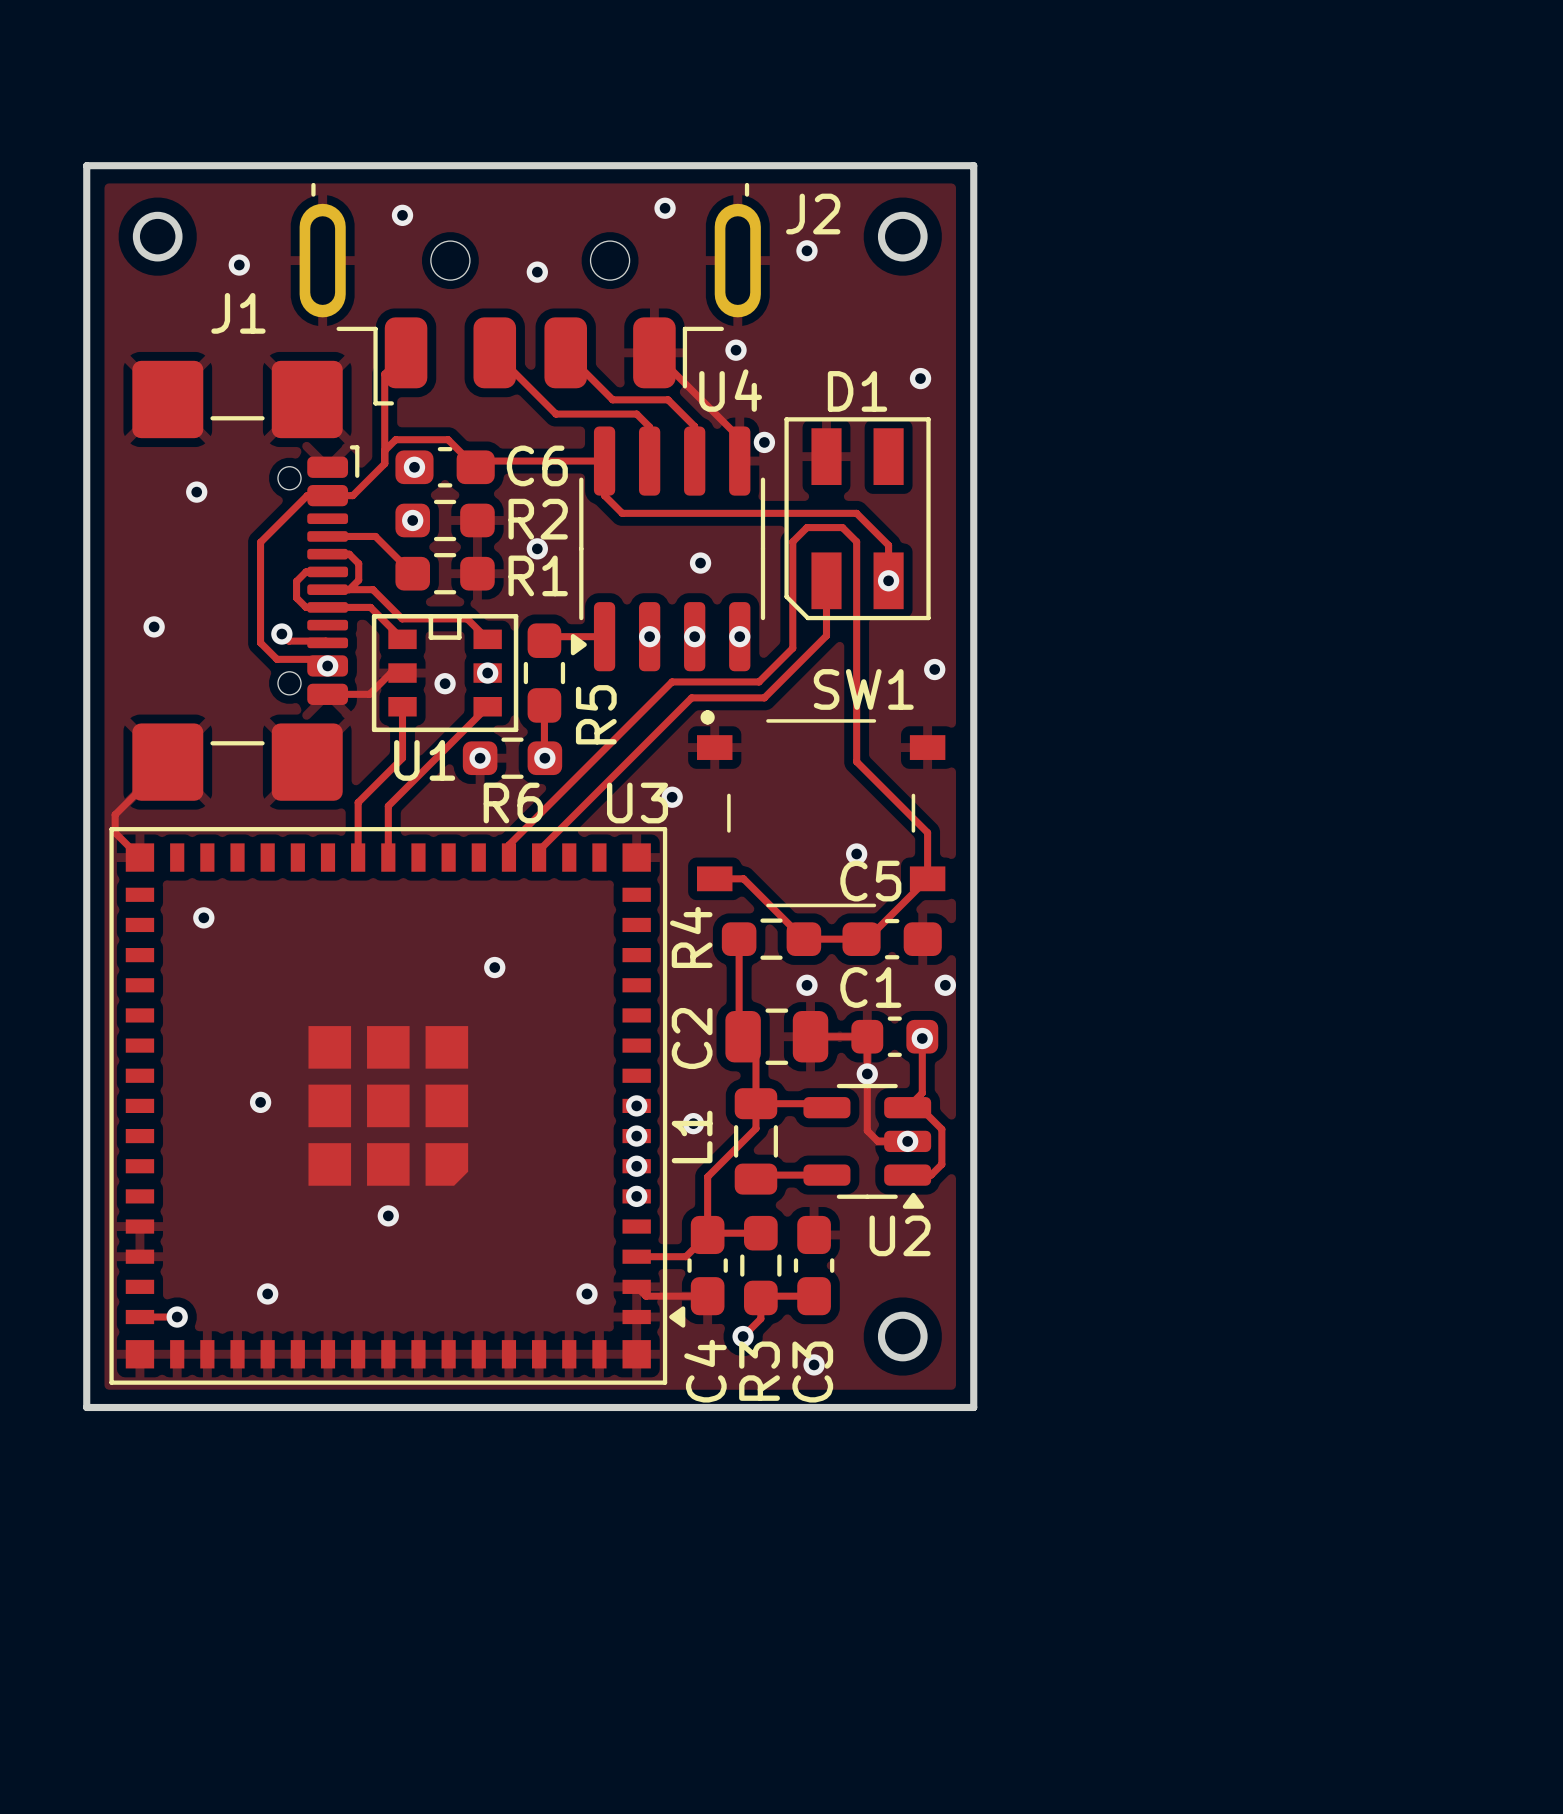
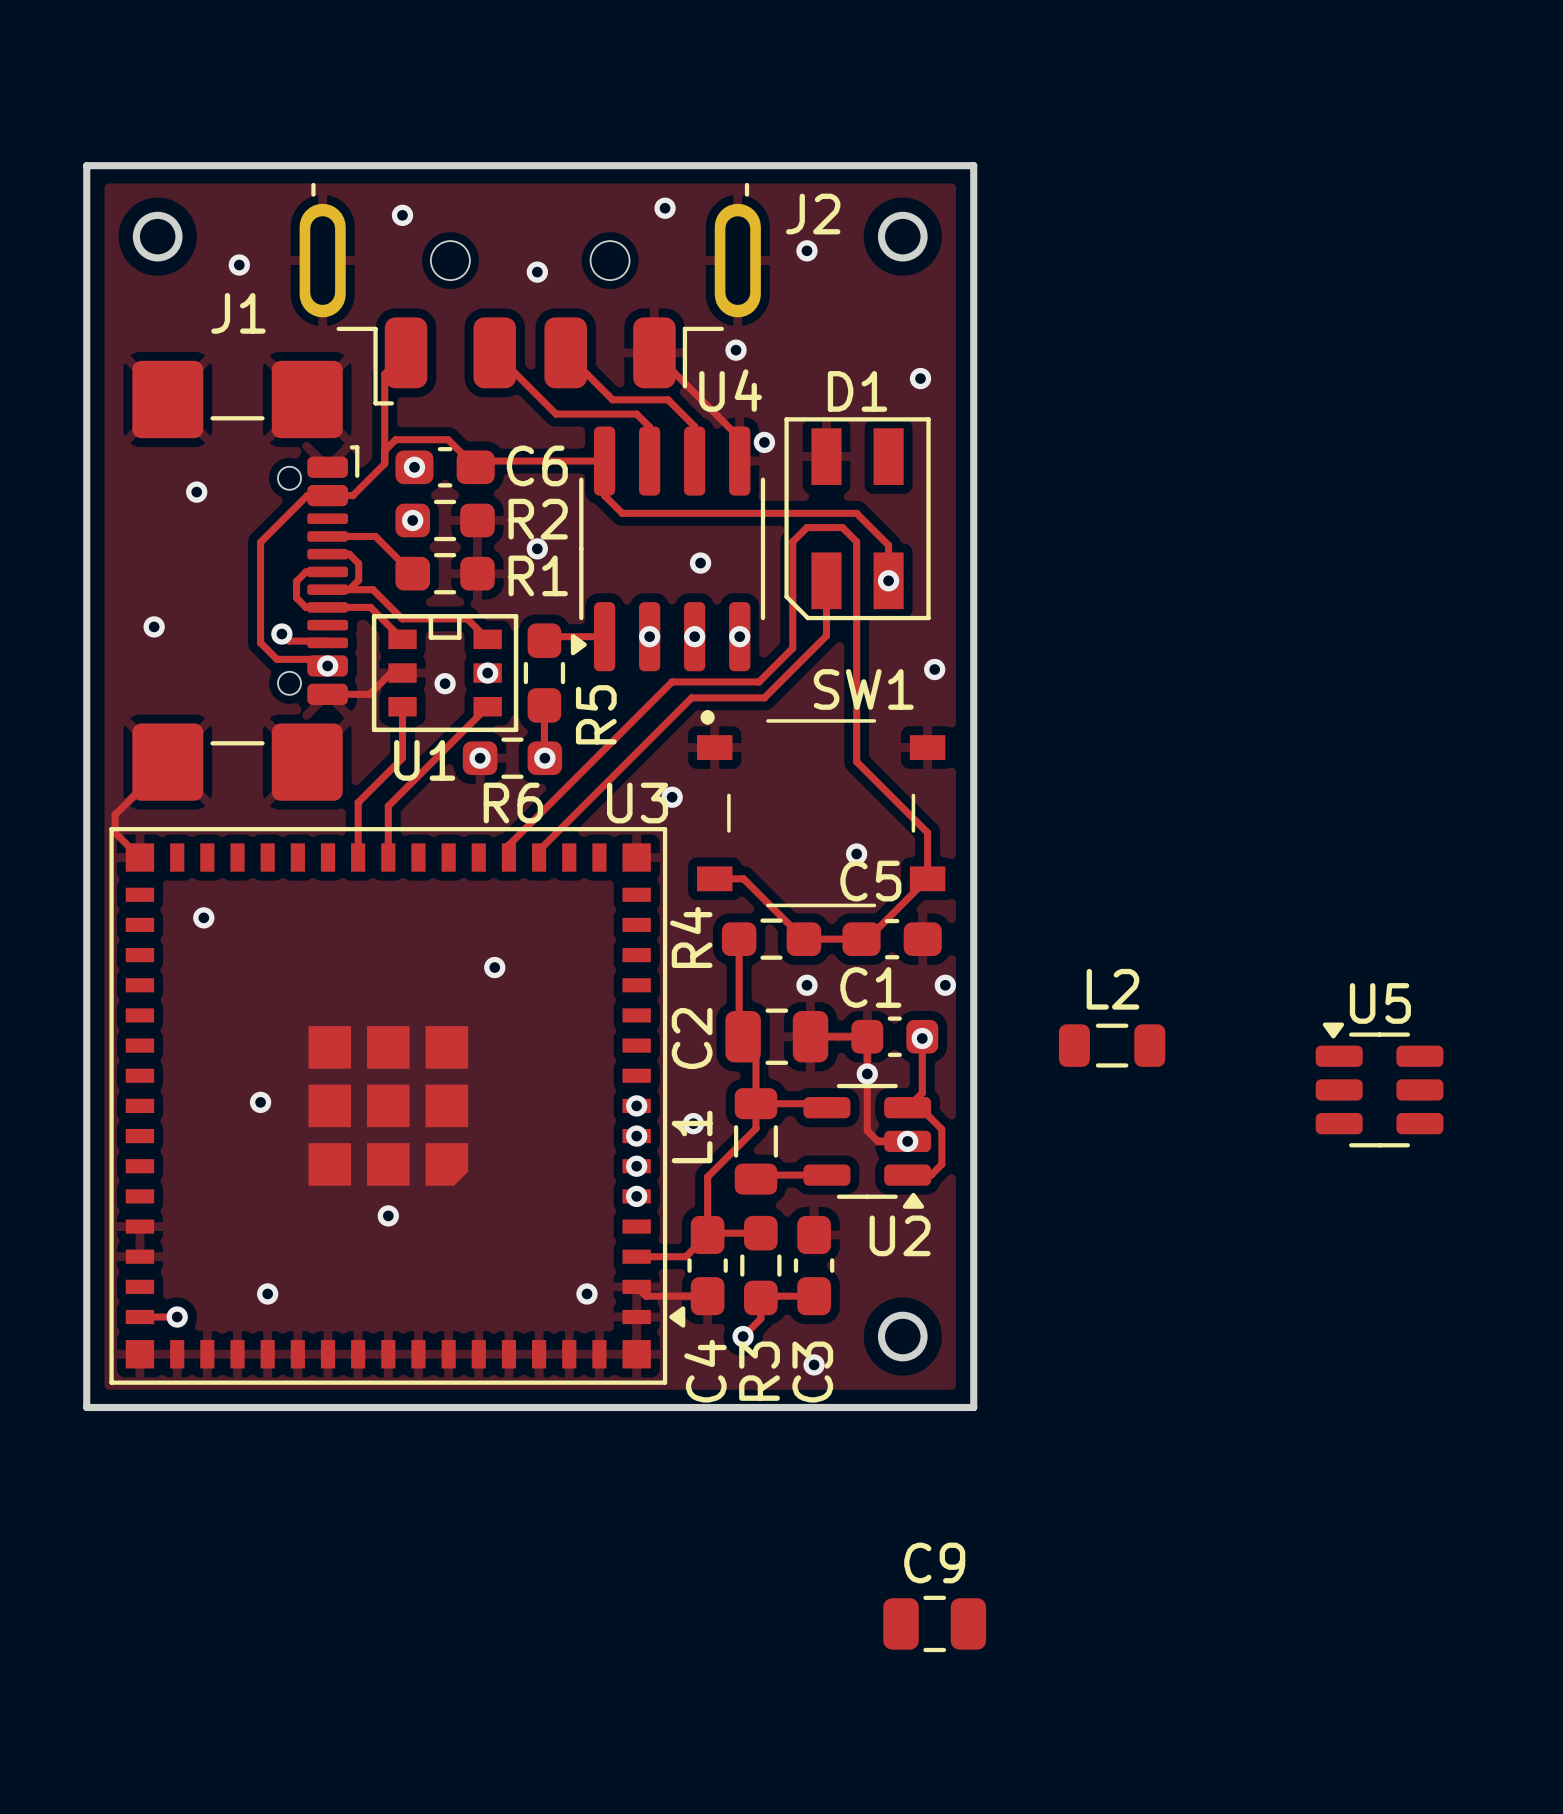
L2: none -> (1112, 1045)
U5: none -> (1379, 1084)
C9: none -> (934, 1623)

